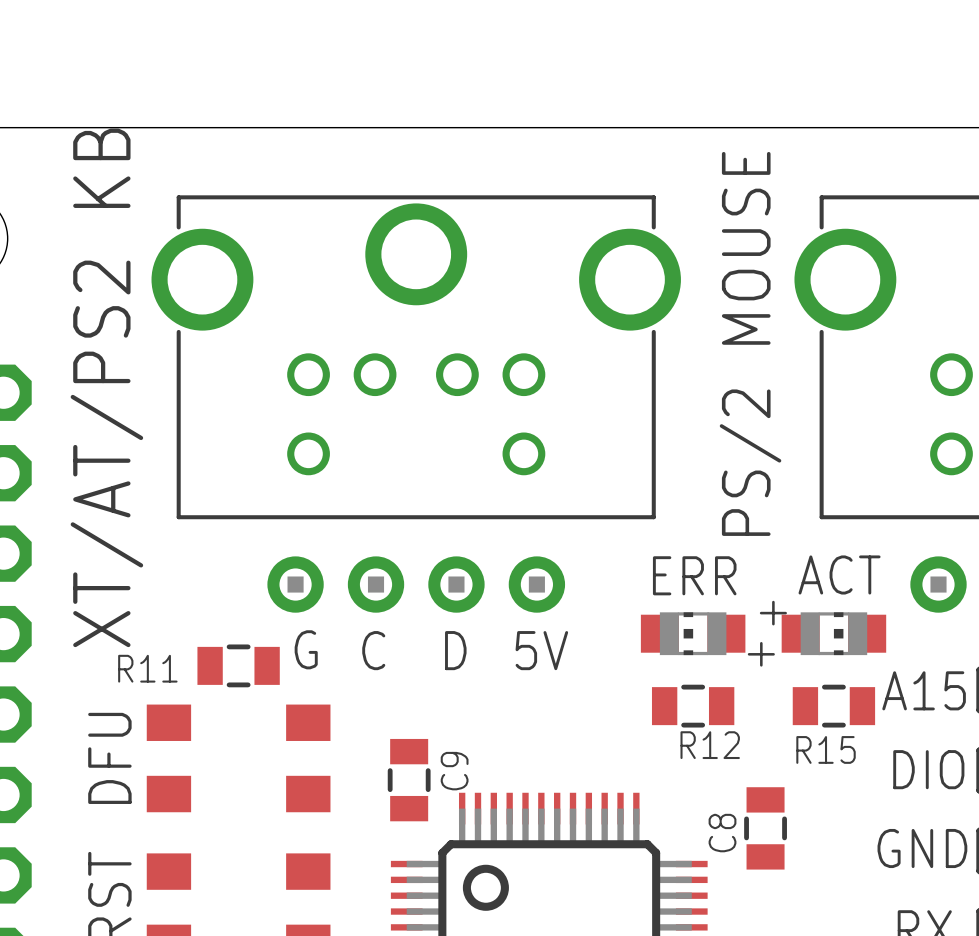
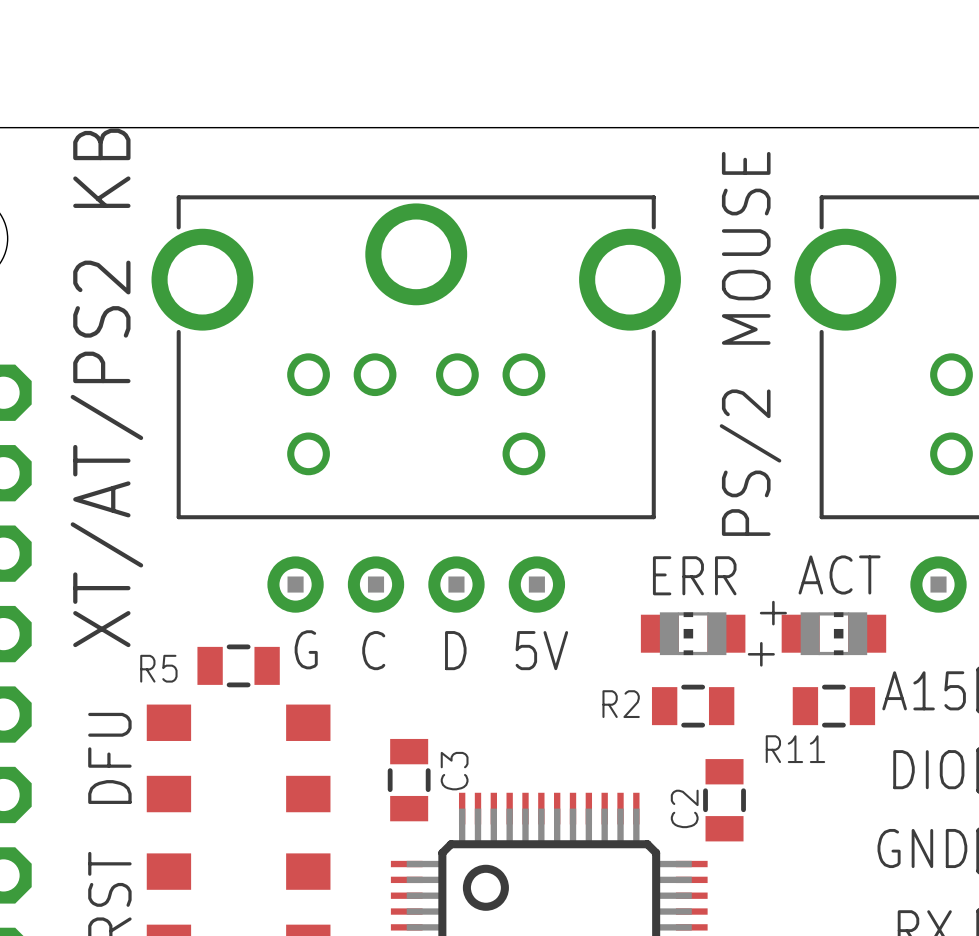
R11 name: R11 (147, 668) -> R5 (158, 668)
R12 name: R12 (710, 745) -> R2 (621, 704)
R15 name: R15 (826, 749) -> R11 (795, 749)
C9 name: C9 (454, 771) -> C3 (454, 771)
C2: none -> (724, 800)
C8: (765, 828) -> none

